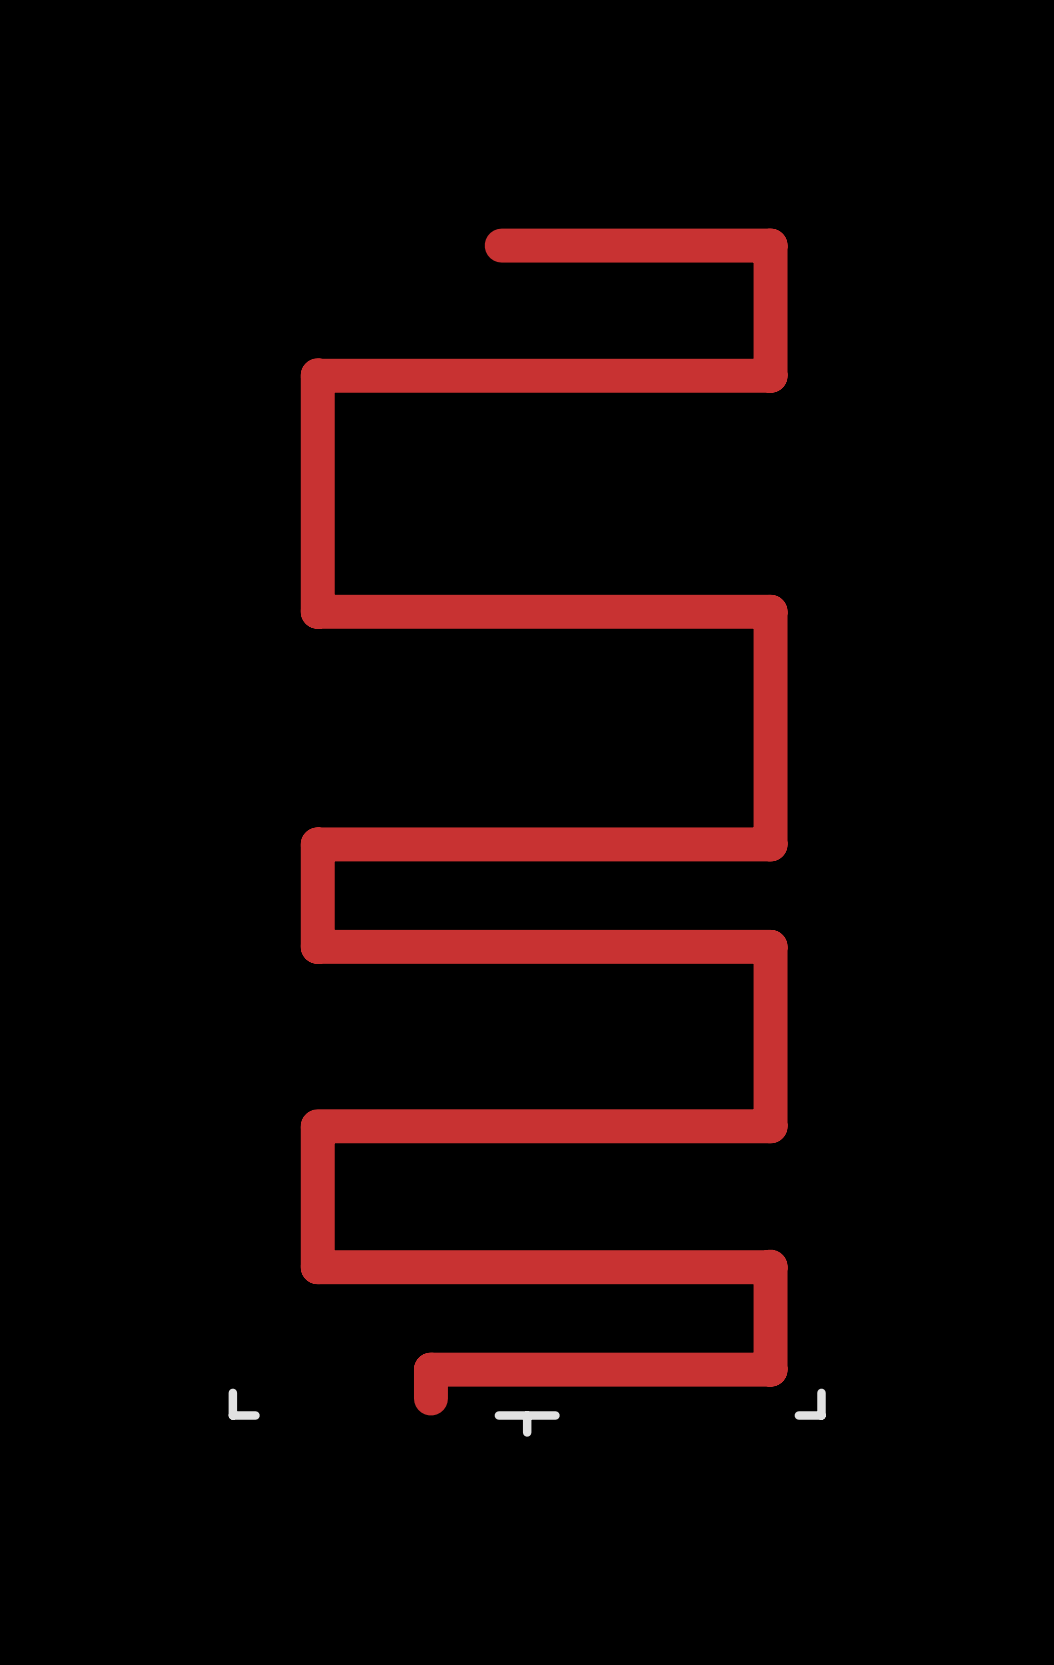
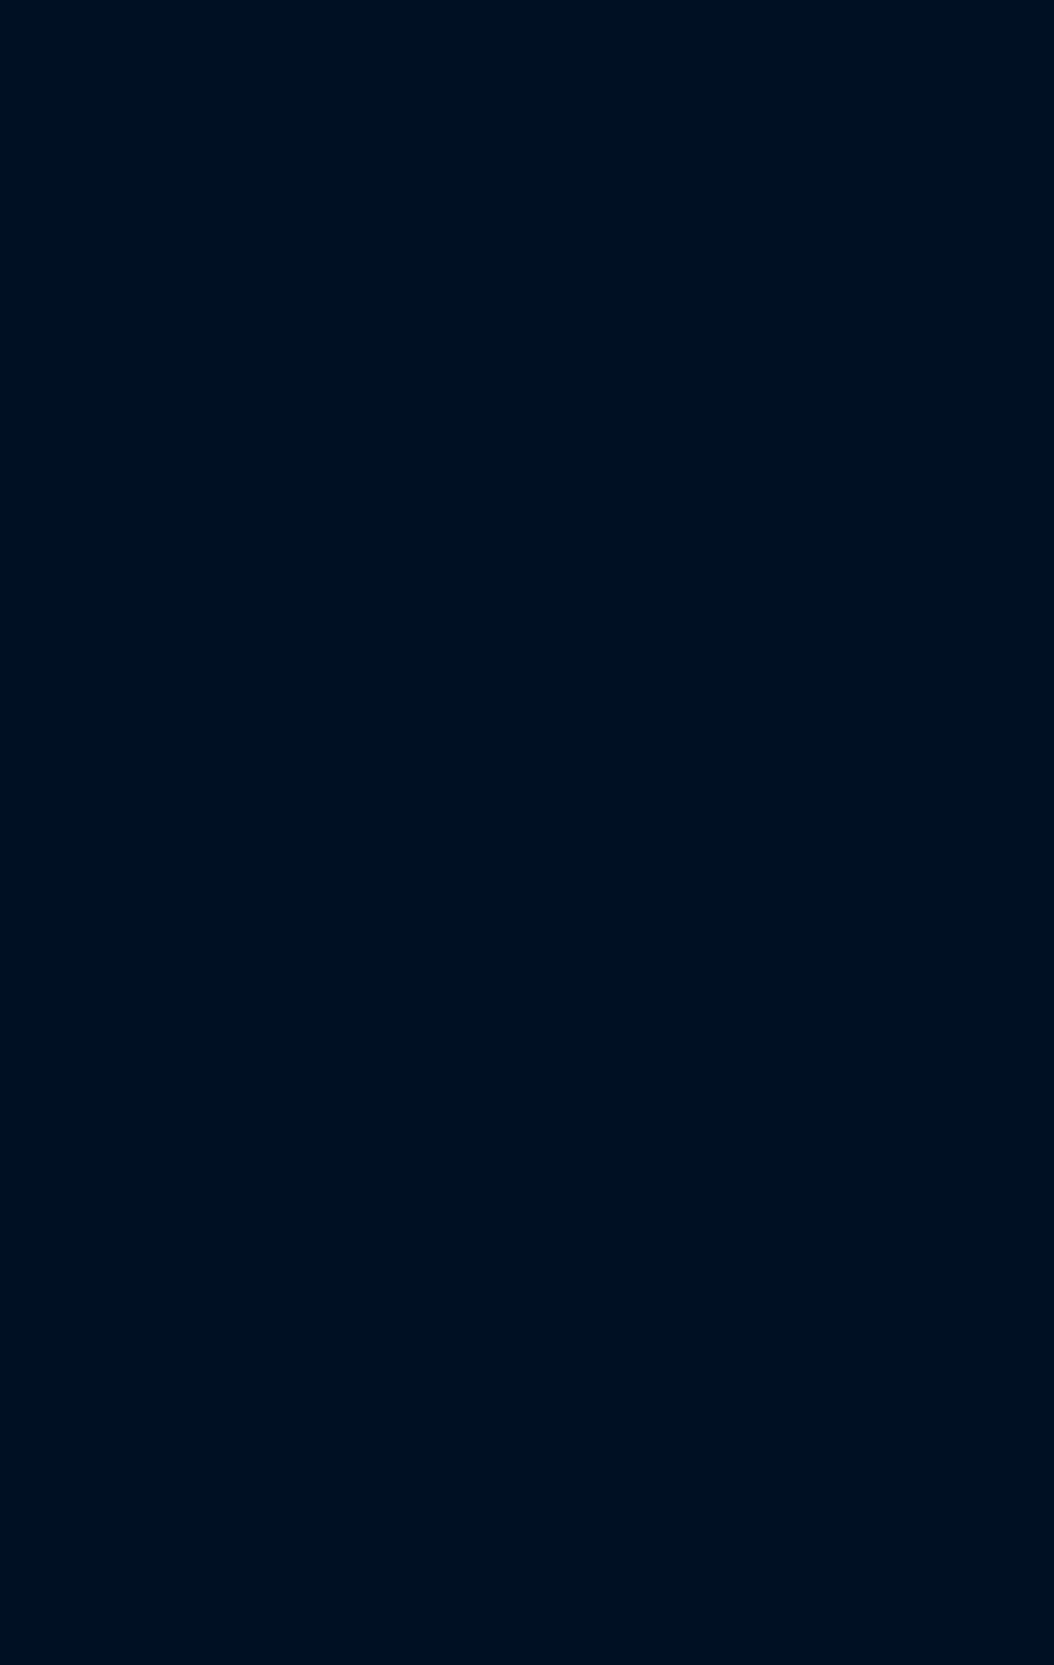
part: (527, 832) -> none

